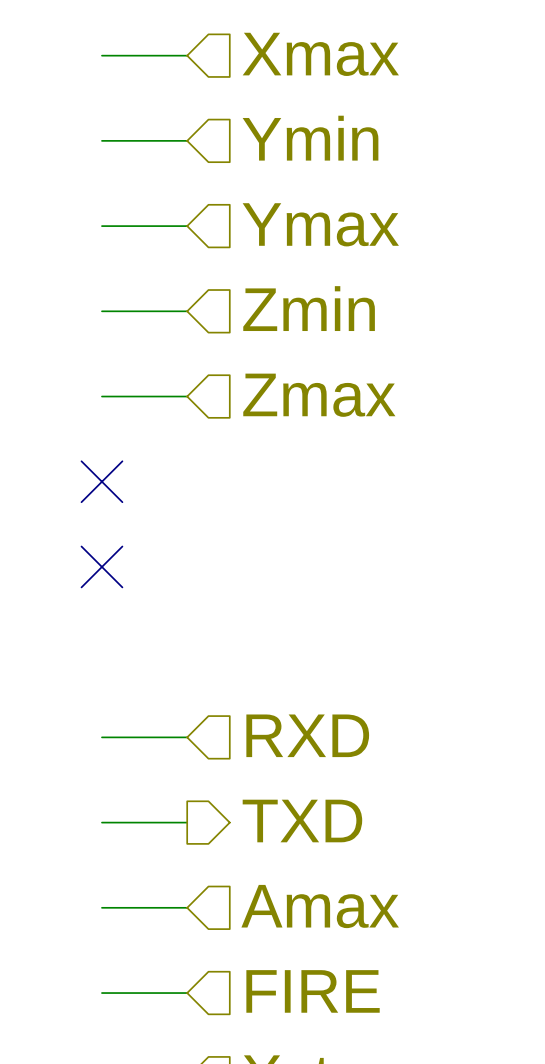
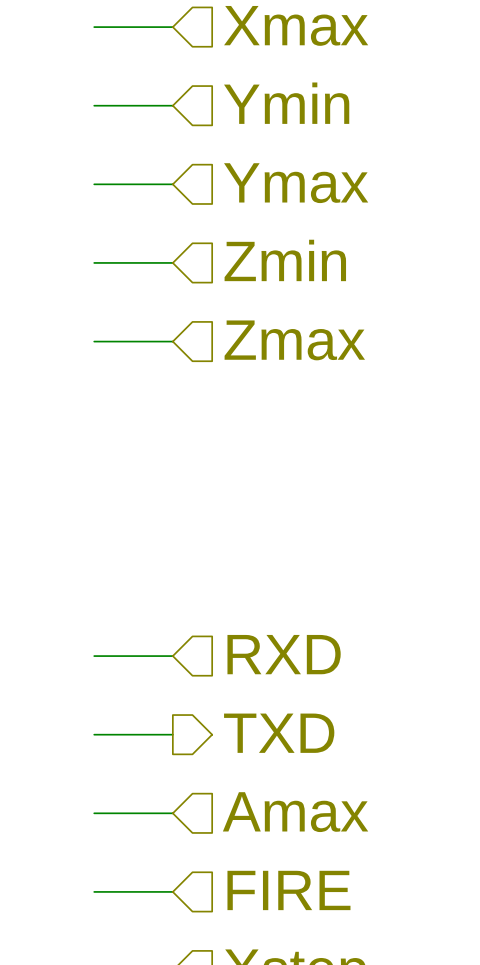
no-connect mark: (101, 481) -> none
no-connect mark: (101, 566) -> none

